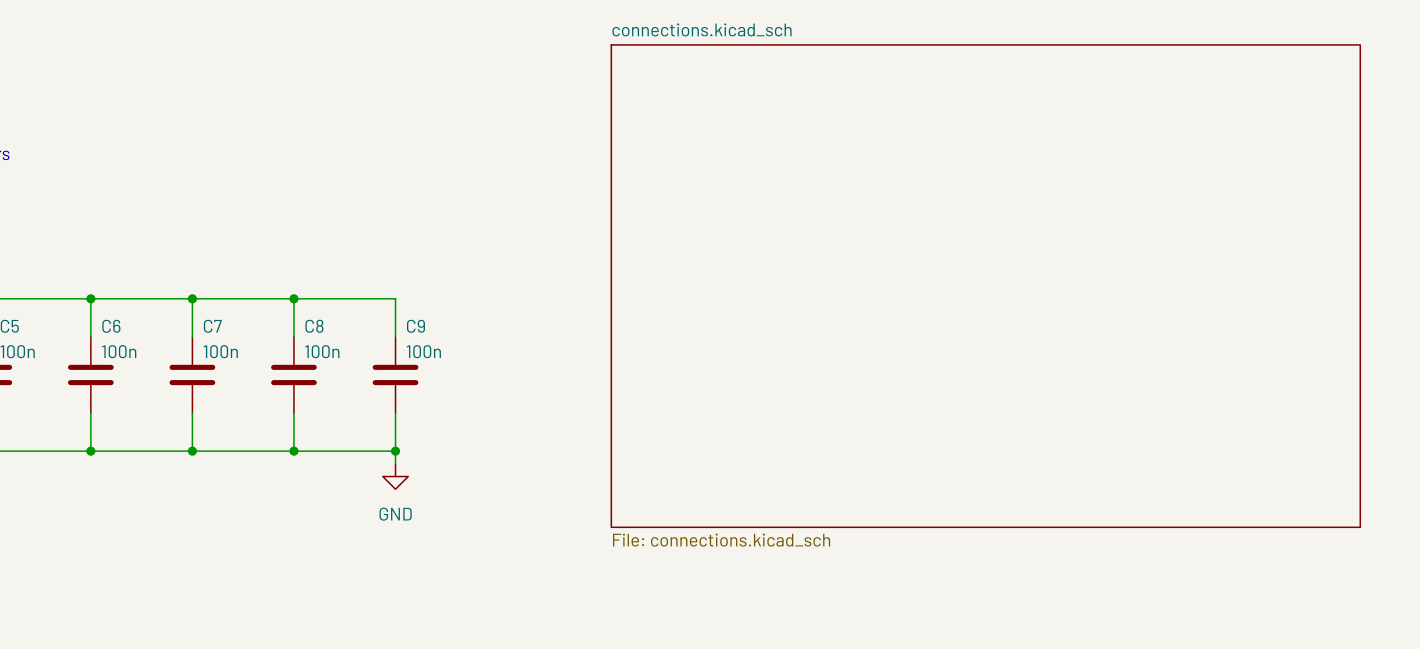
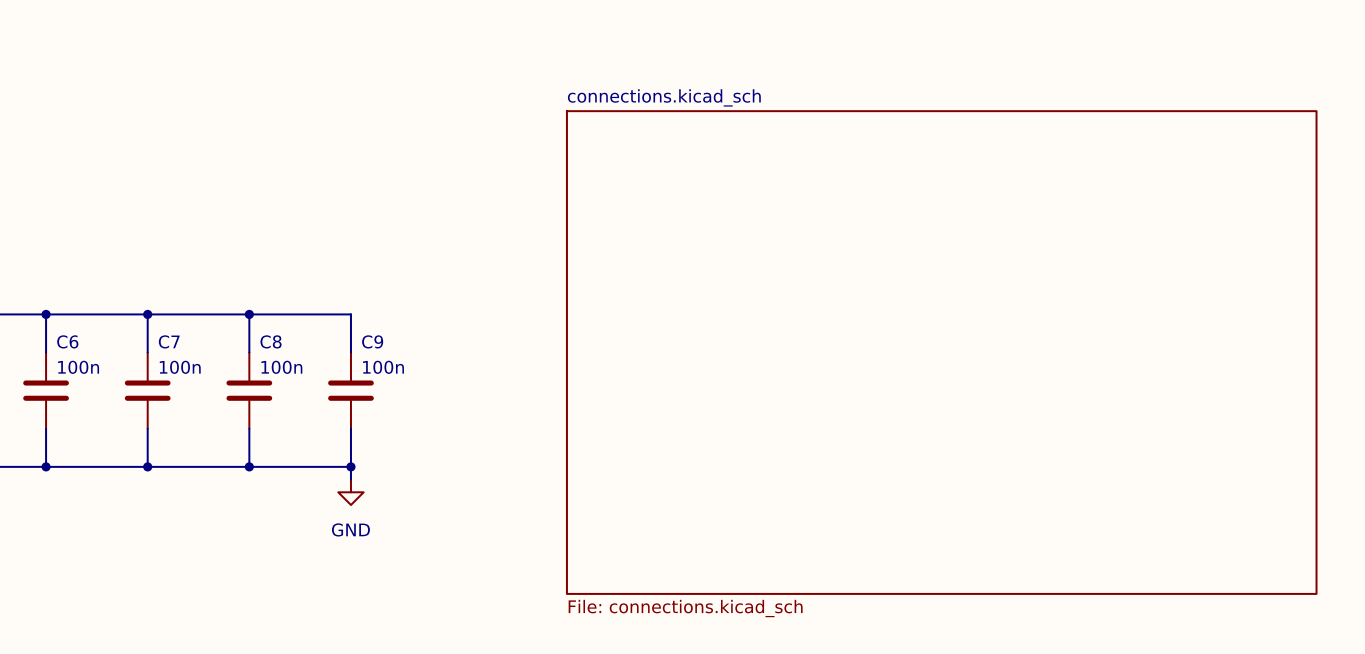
sheet connections.kicad_sch position: (985, 286) -> (941, 352)

